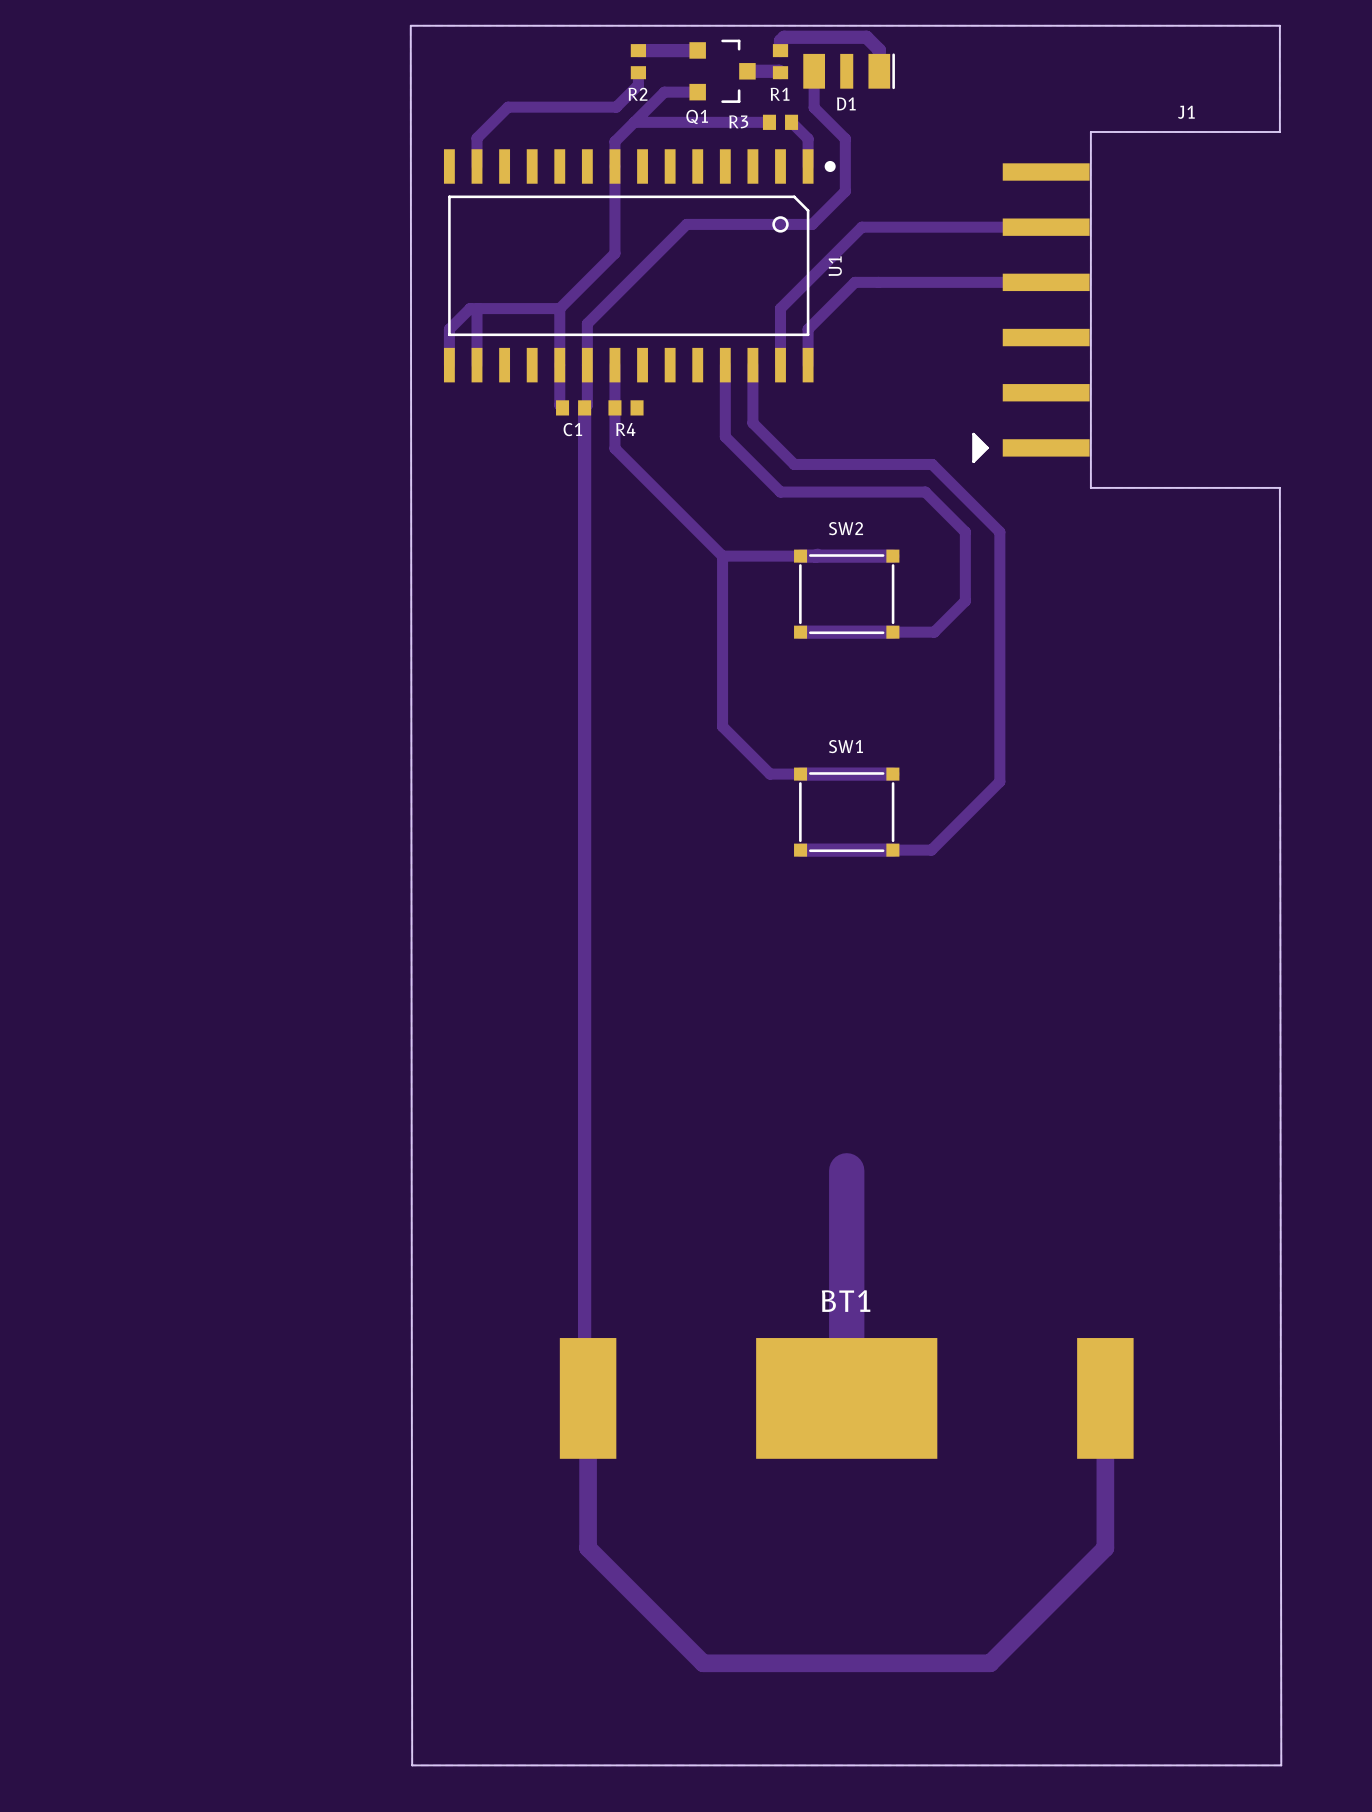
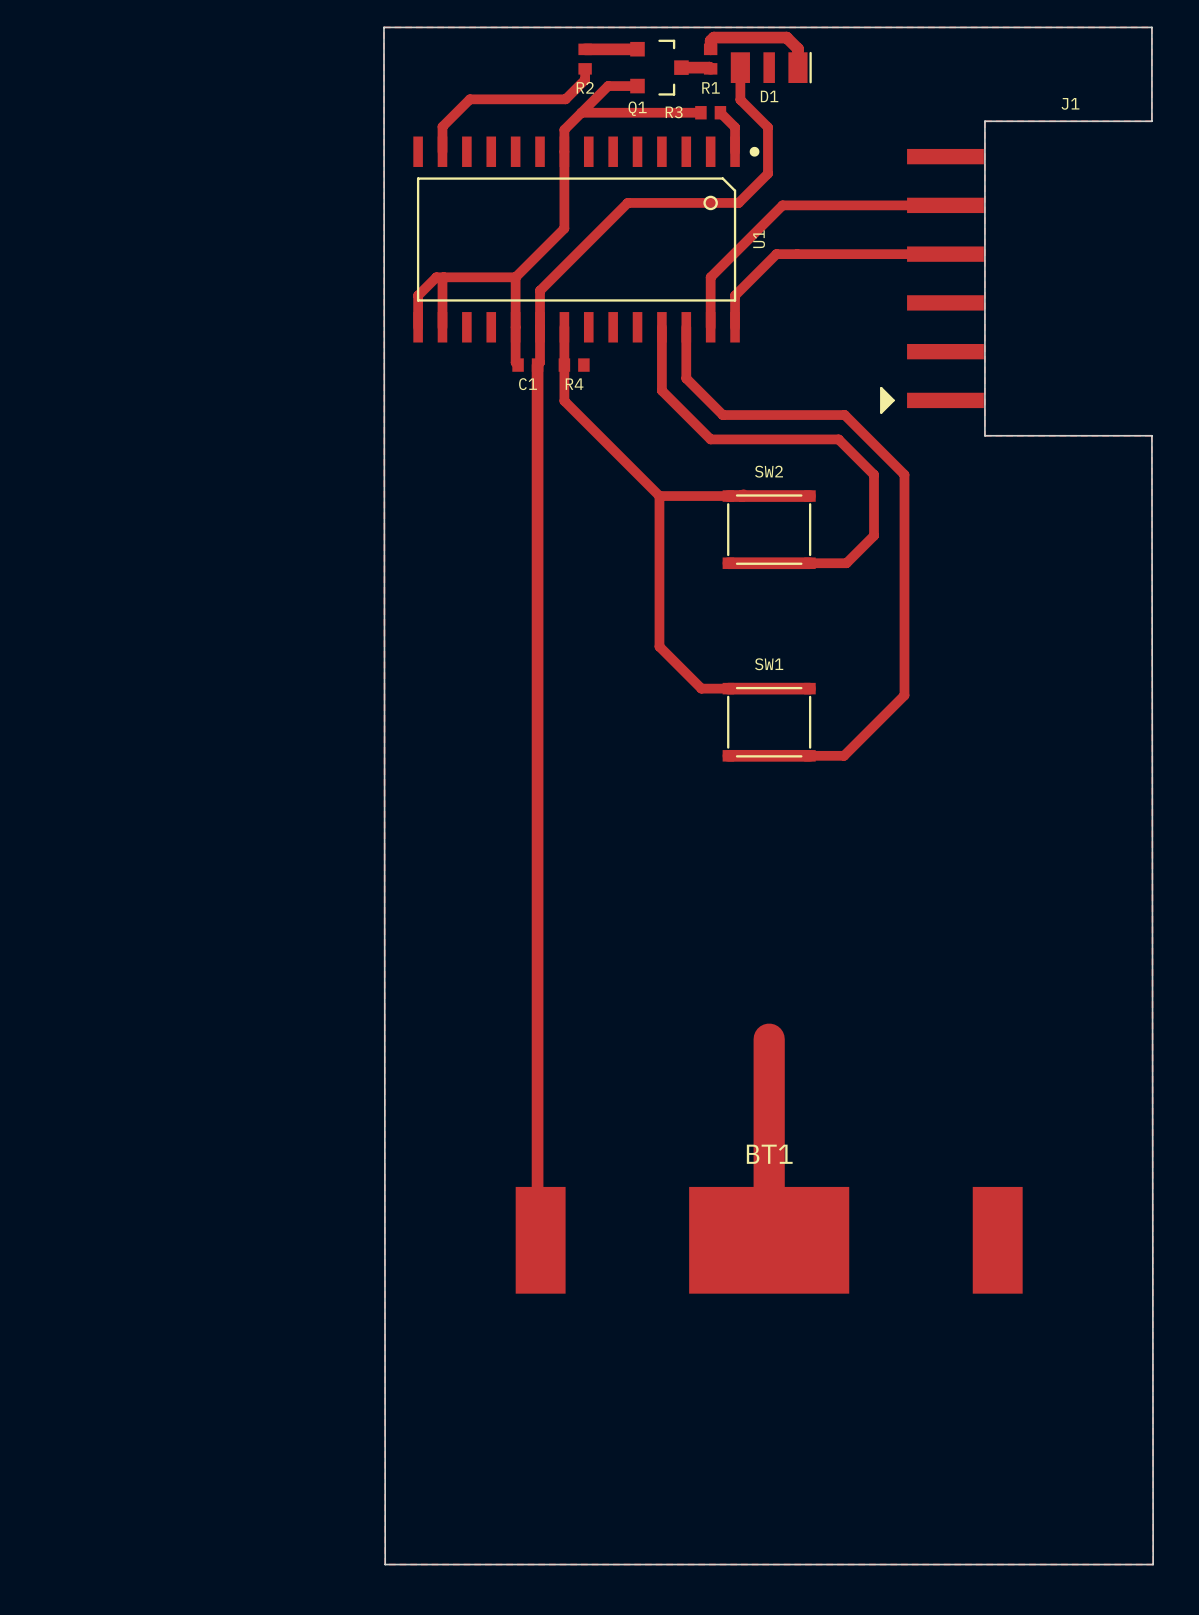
track: (588, 1398) (588, 1548) (703, 1663) (990, 1663) (1105, 1548) (1105, 1398) -> none

